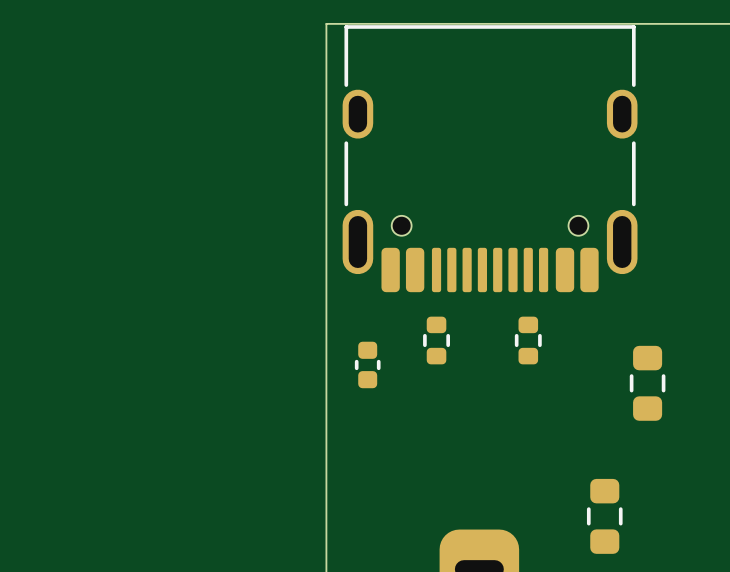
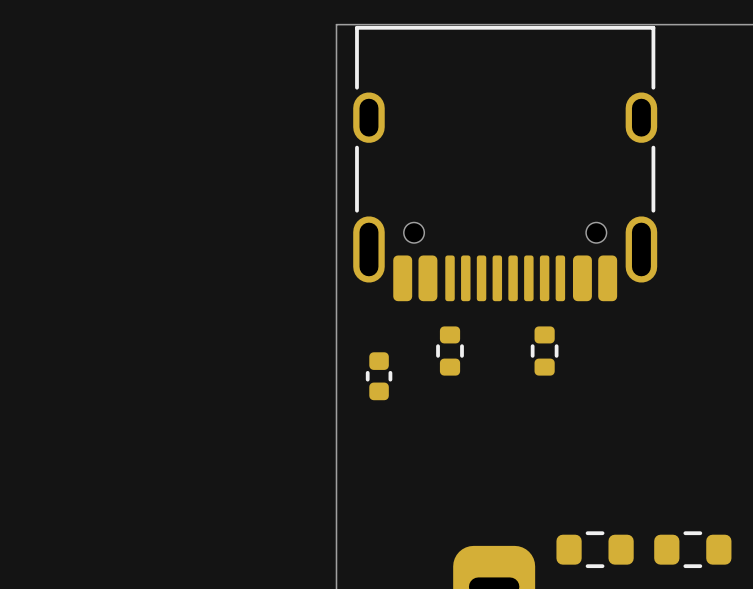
part: (647, 383) -> none
part rotation: 0° (604, 516) -> 90° clockwise (595, 549)
part: none -> (692, 549)

